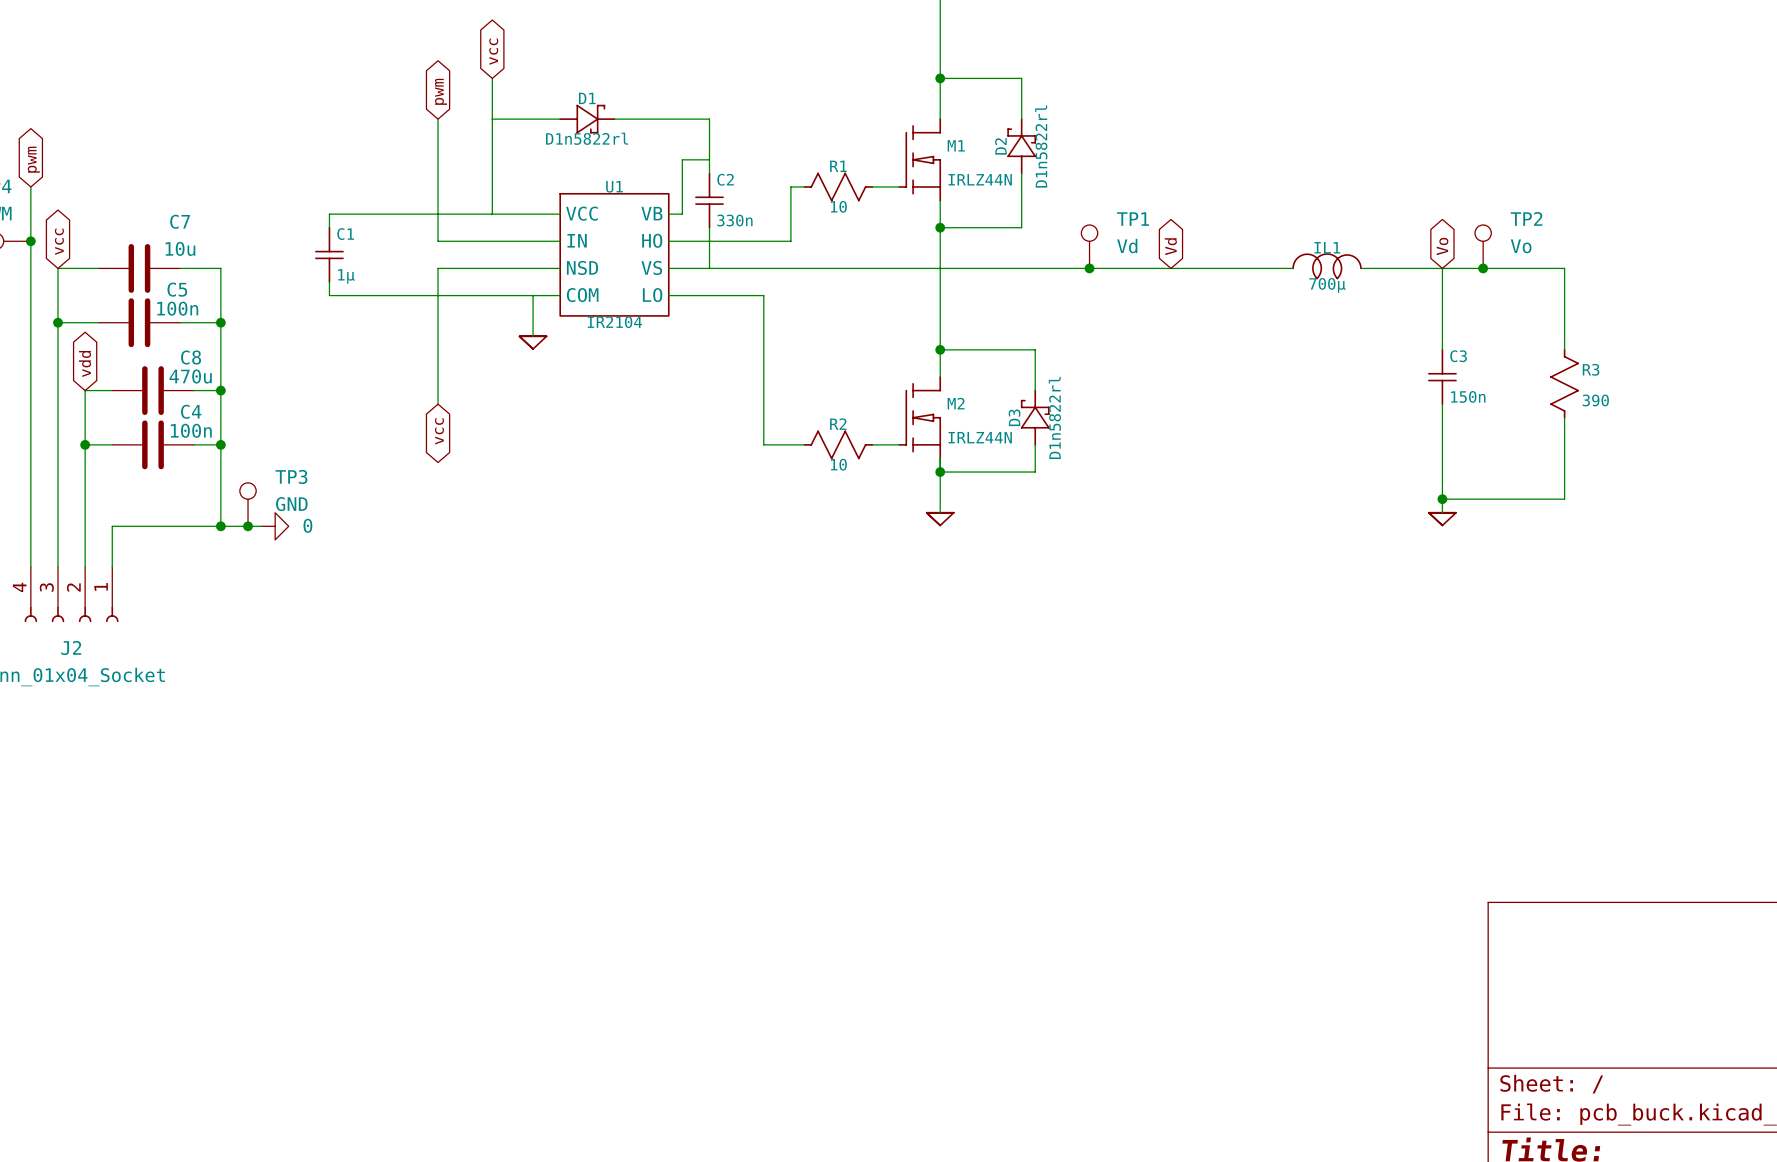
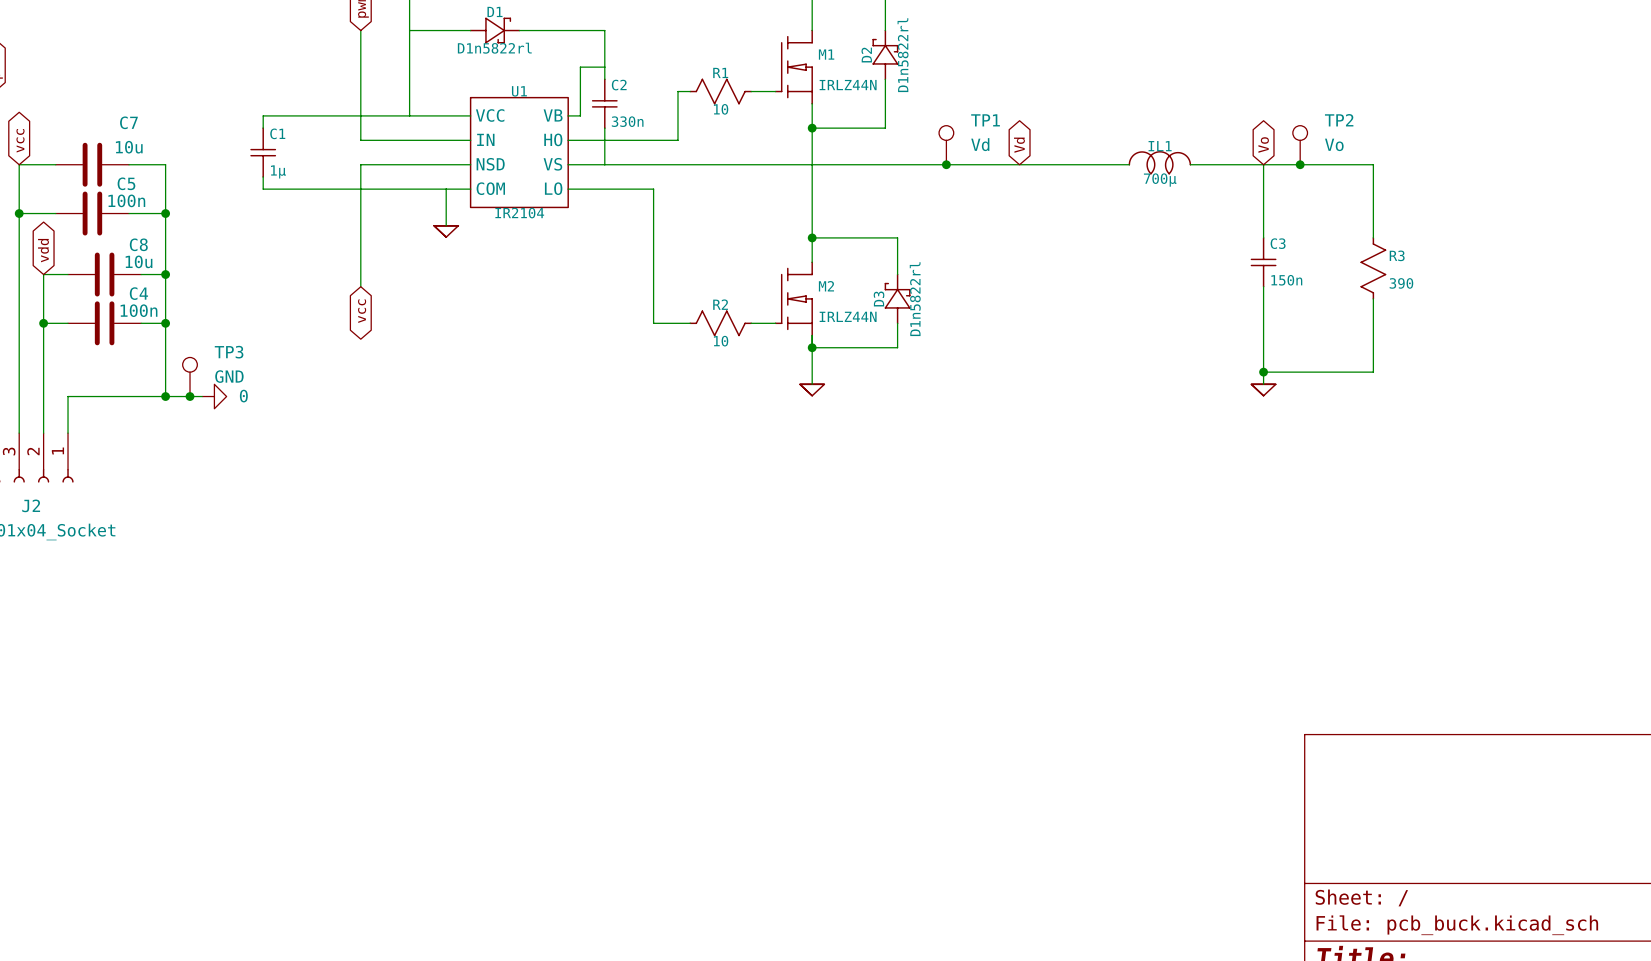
C8 value: 470u (190, 376) -> 10u (139, 261)

